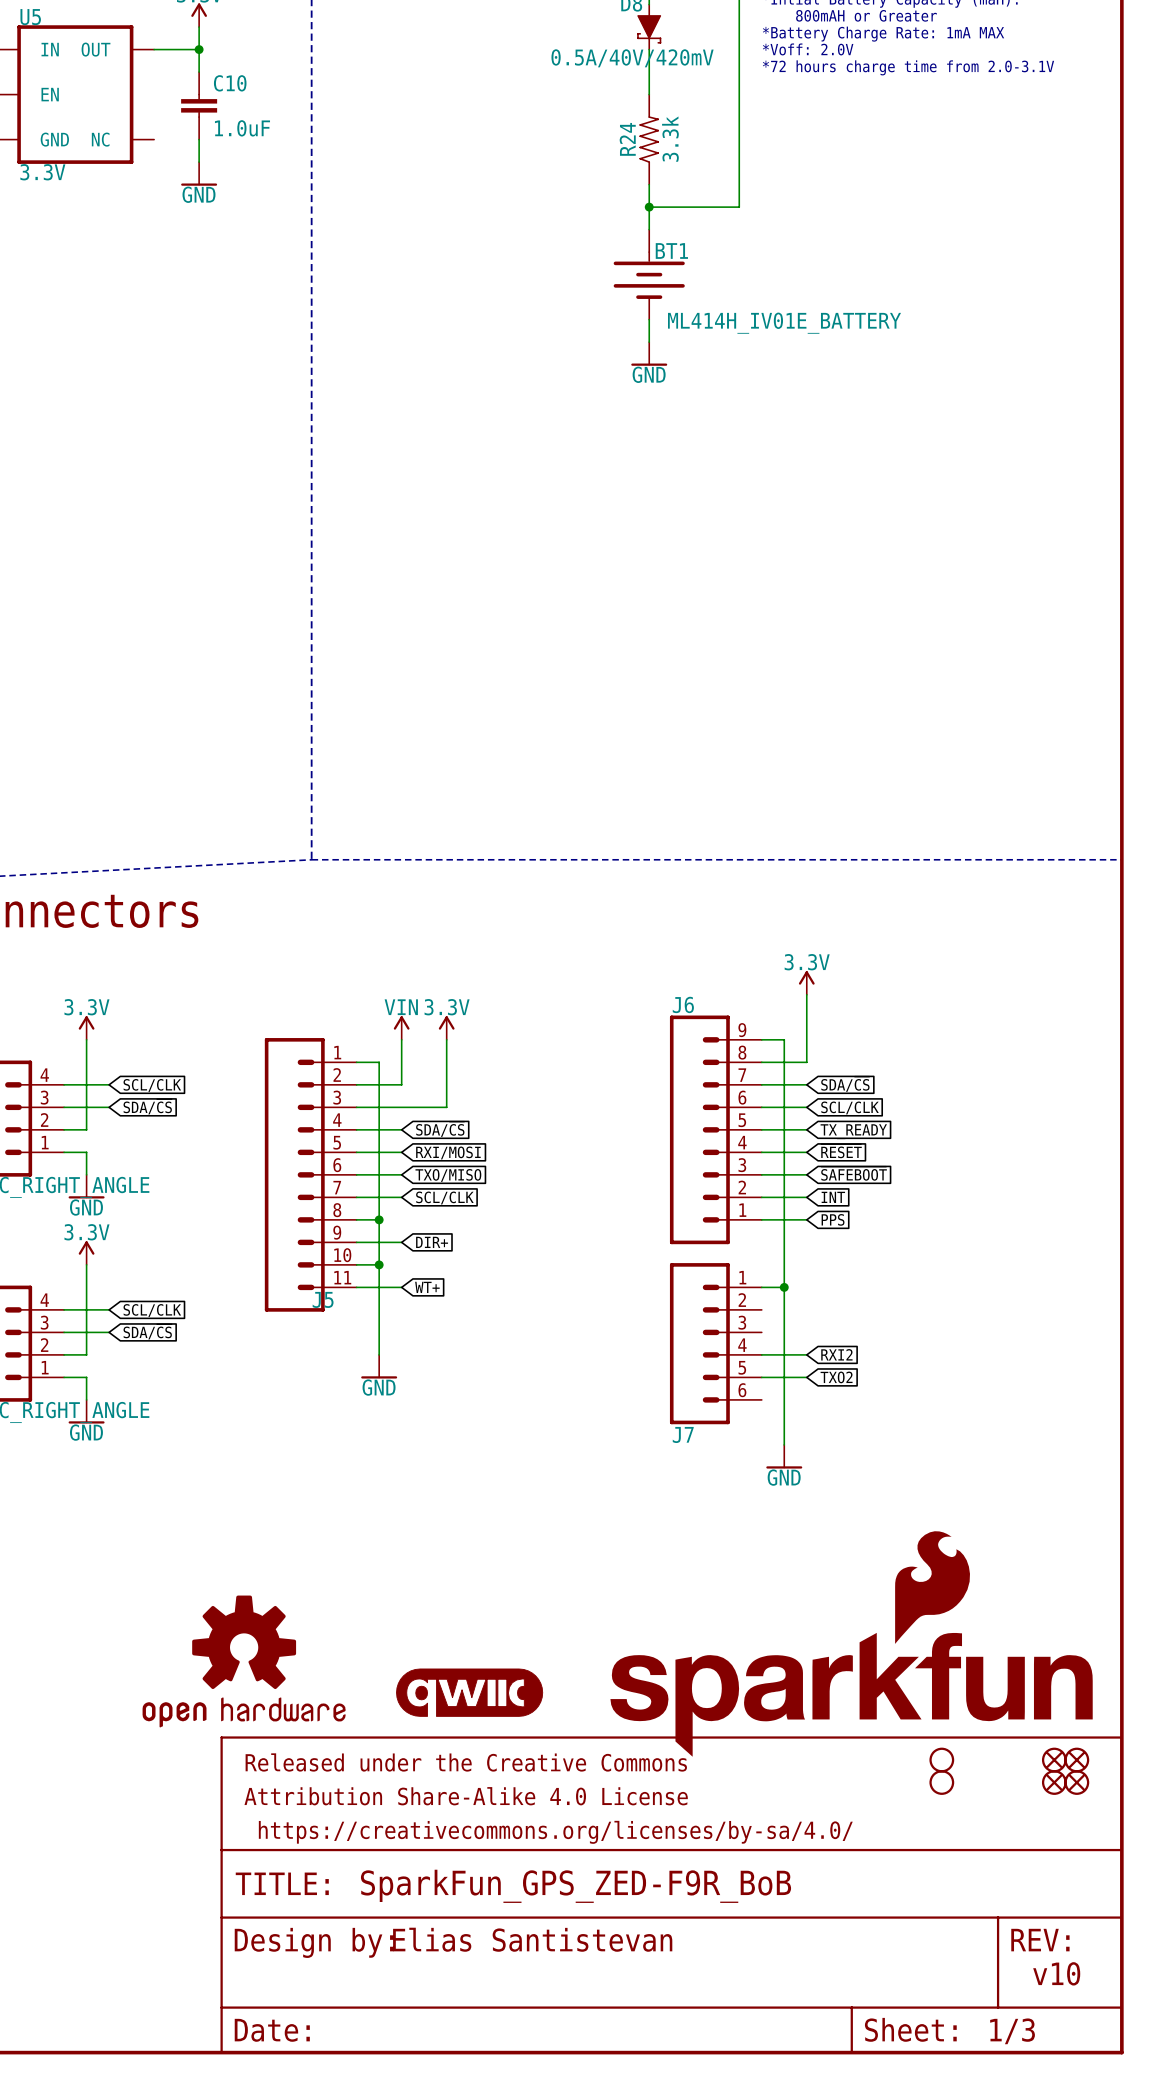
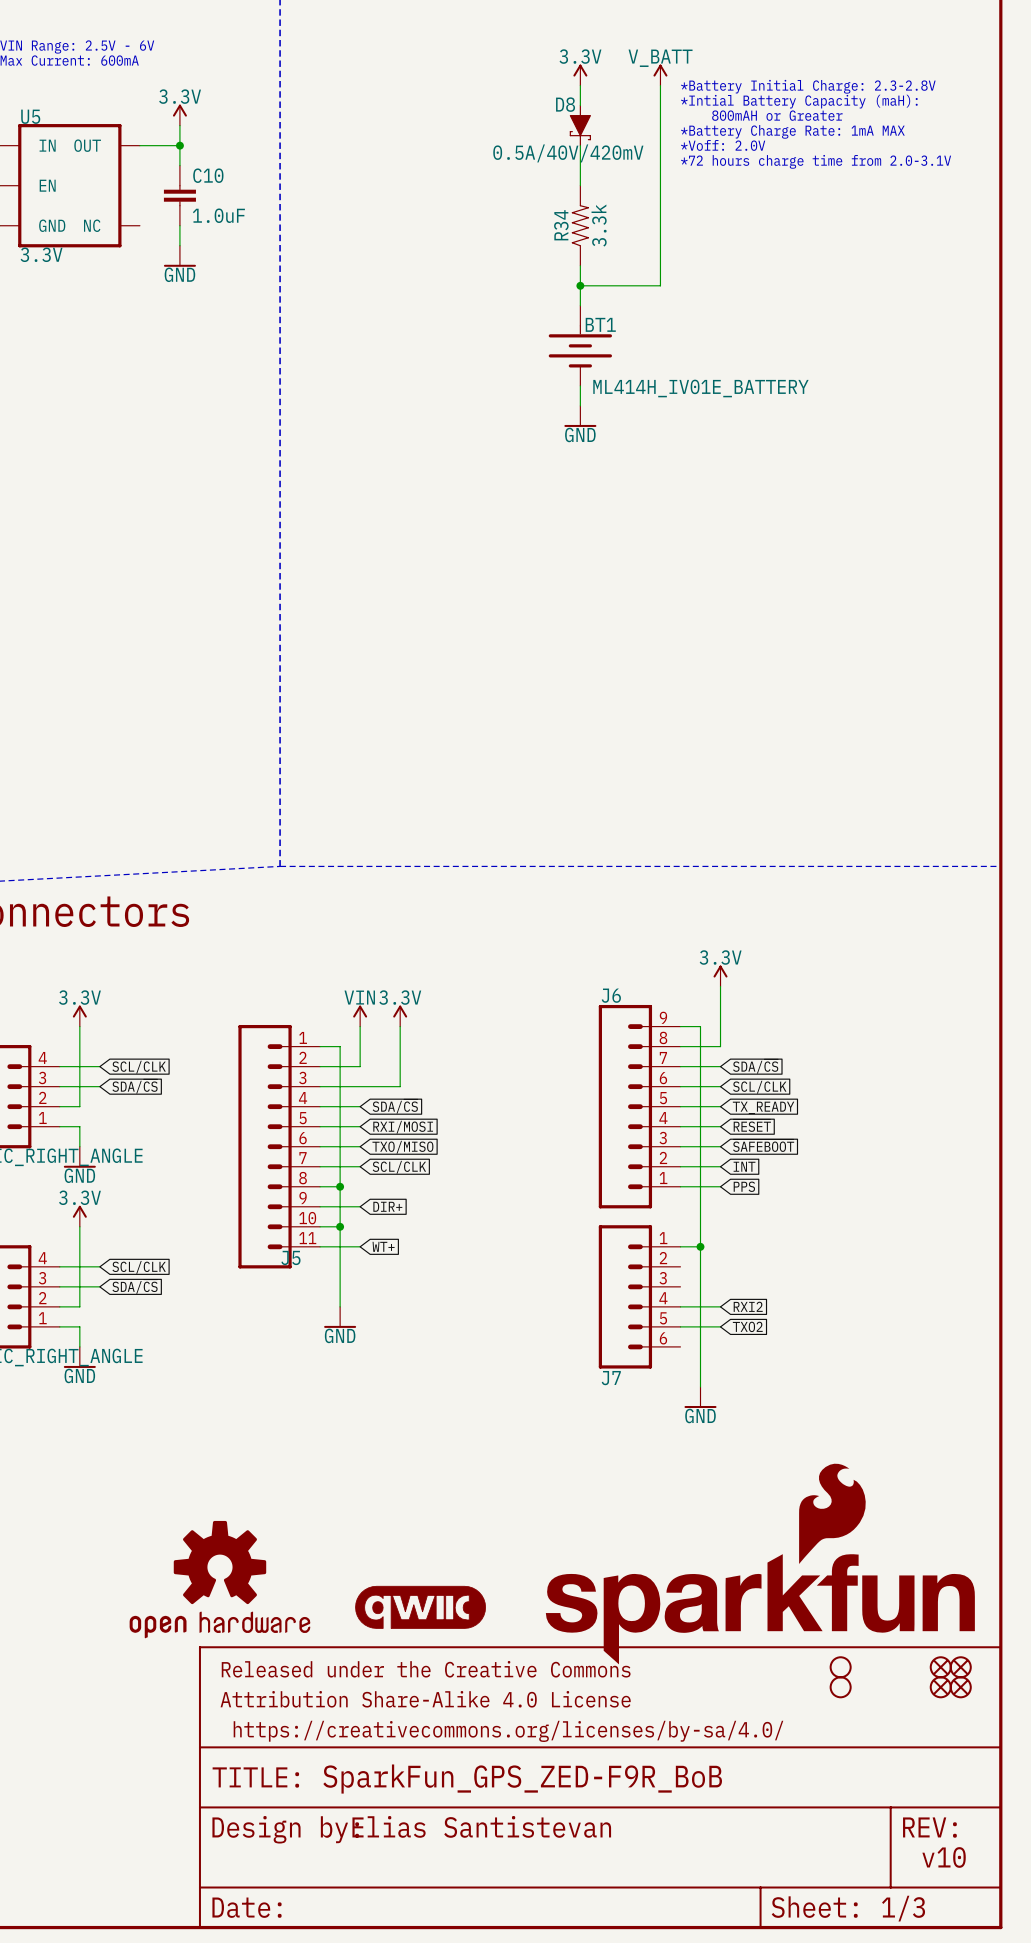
R24 name: R24 (627, 139) -> R34 (561, 225)

